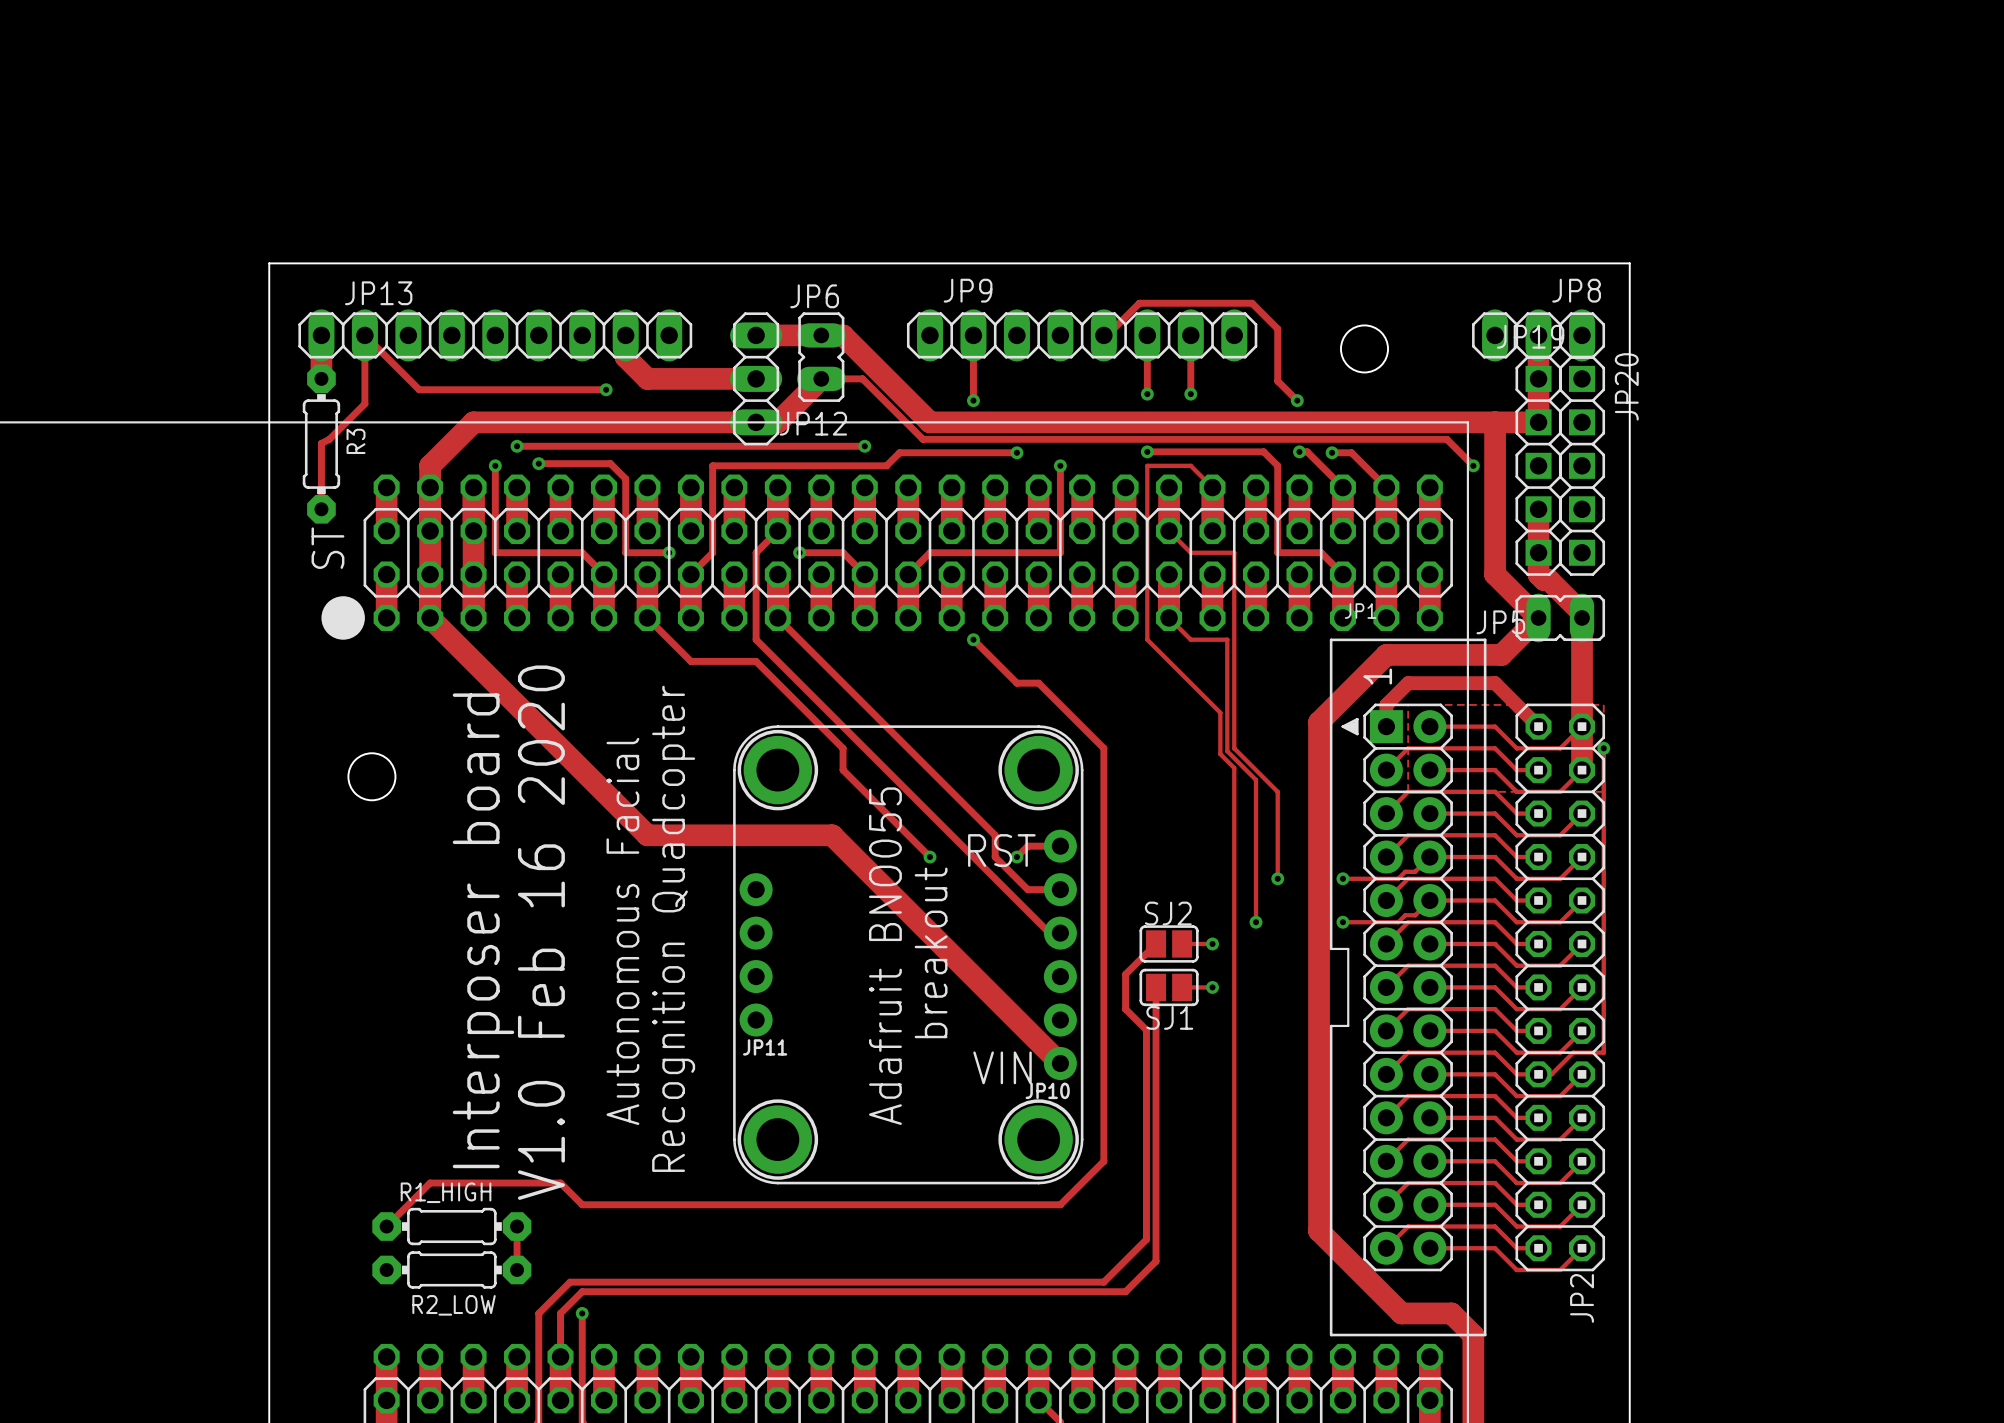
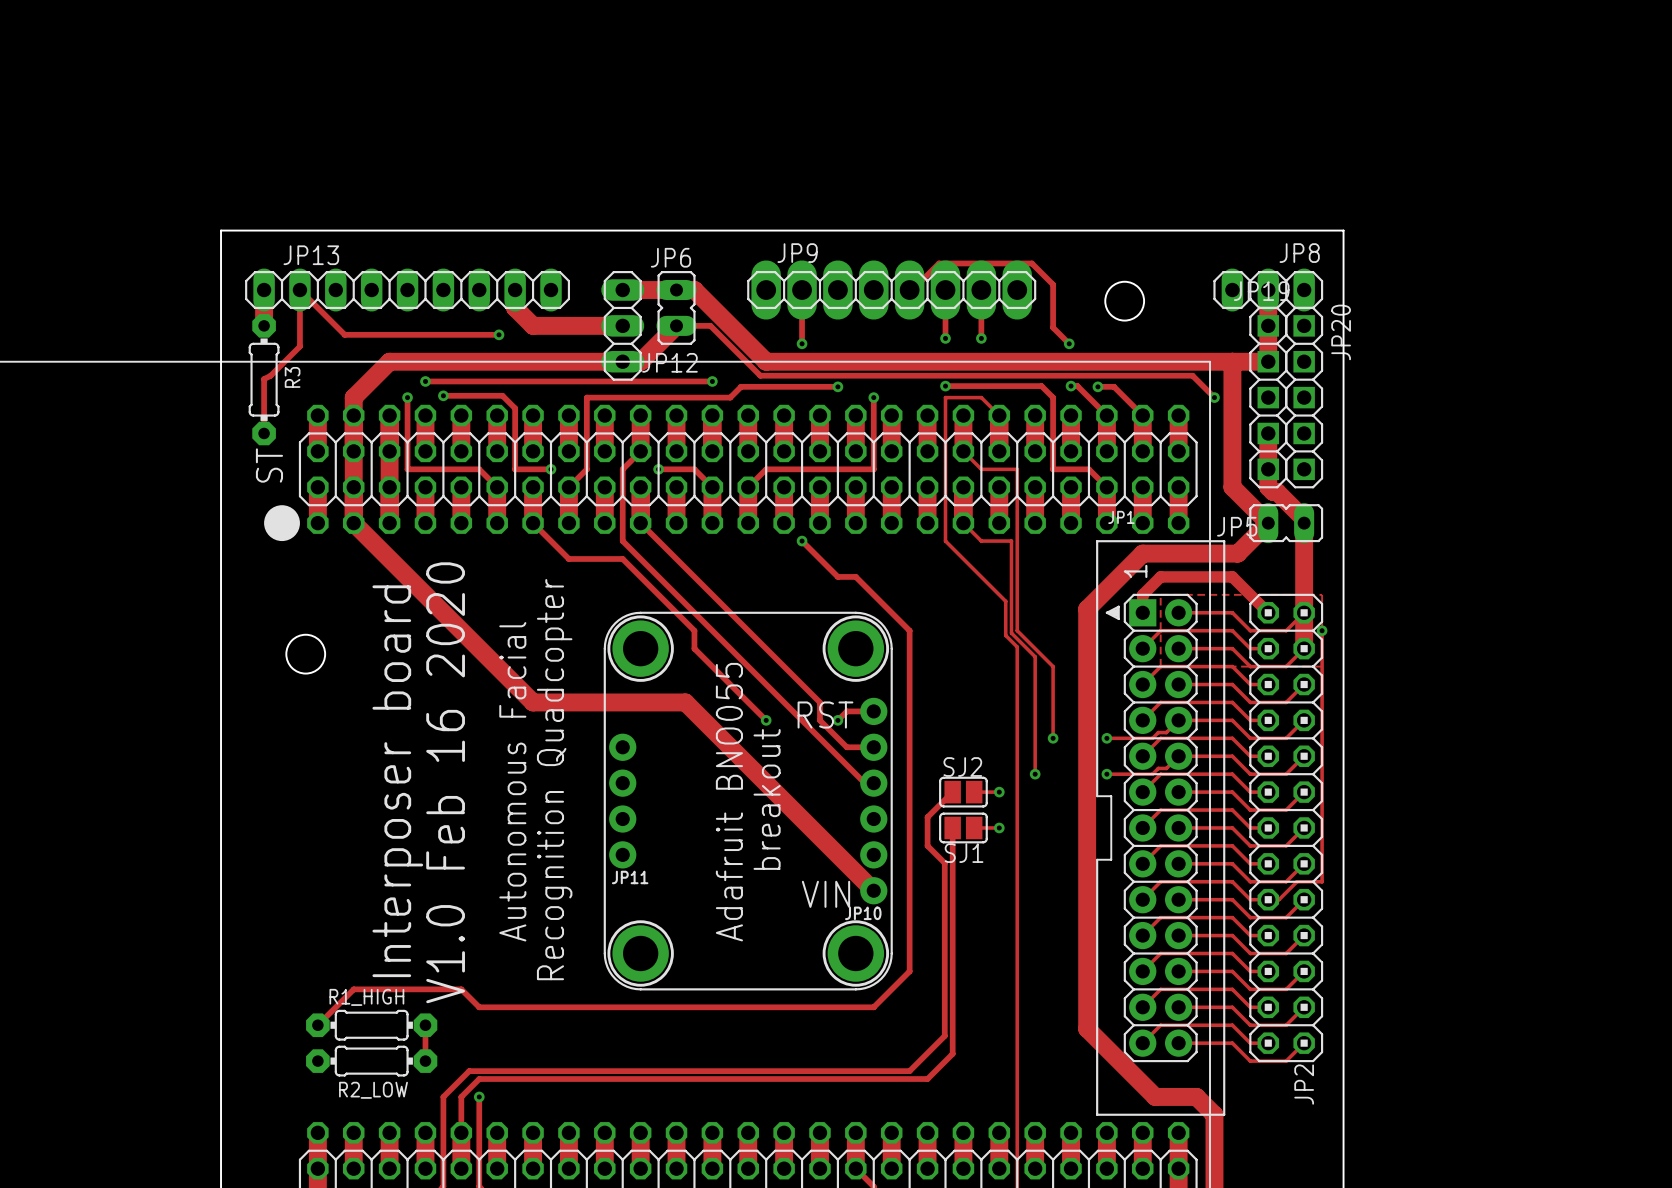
JP9 footprint: [906, 309, 1258, 362] -> [747, 260, 1037, 320]

